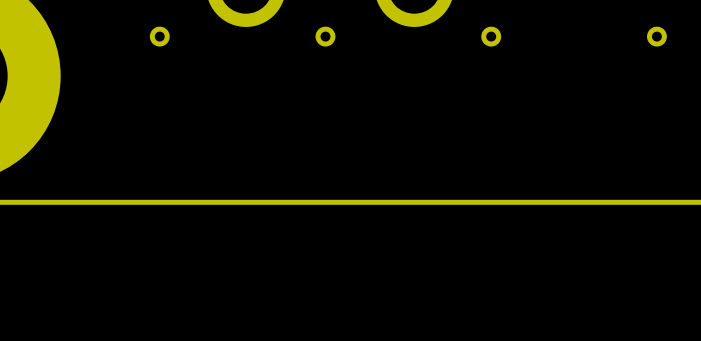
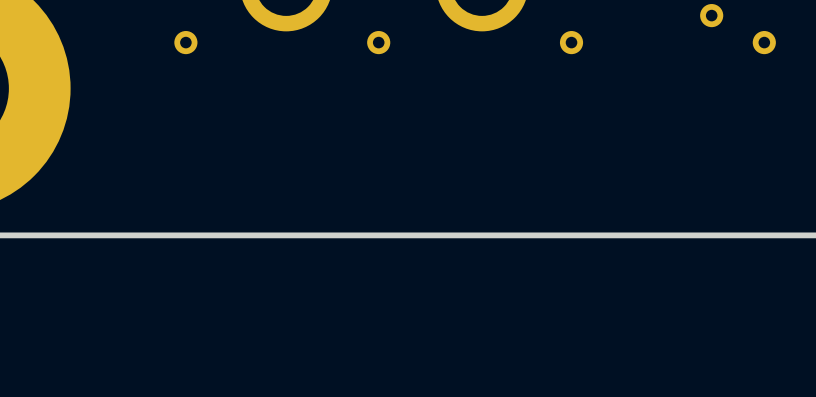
part: none -> (711, 15)

